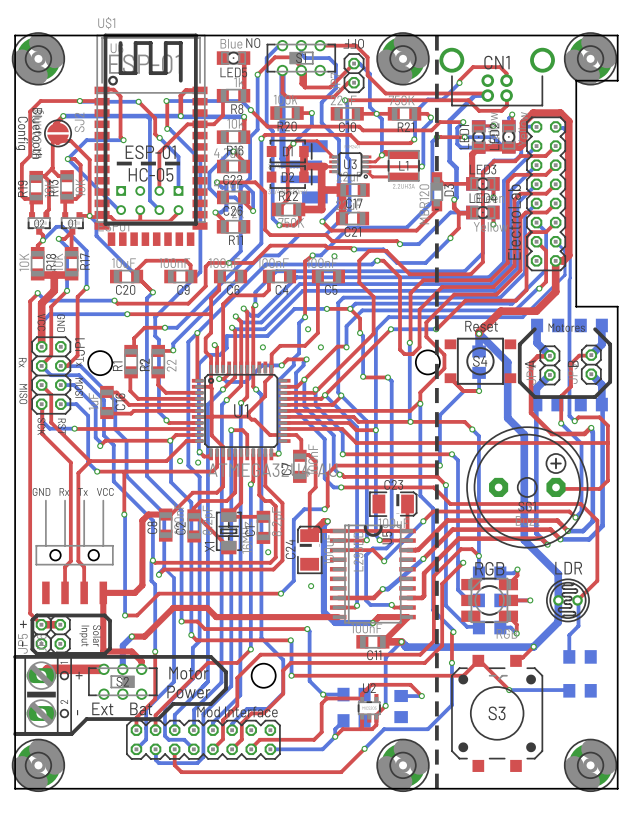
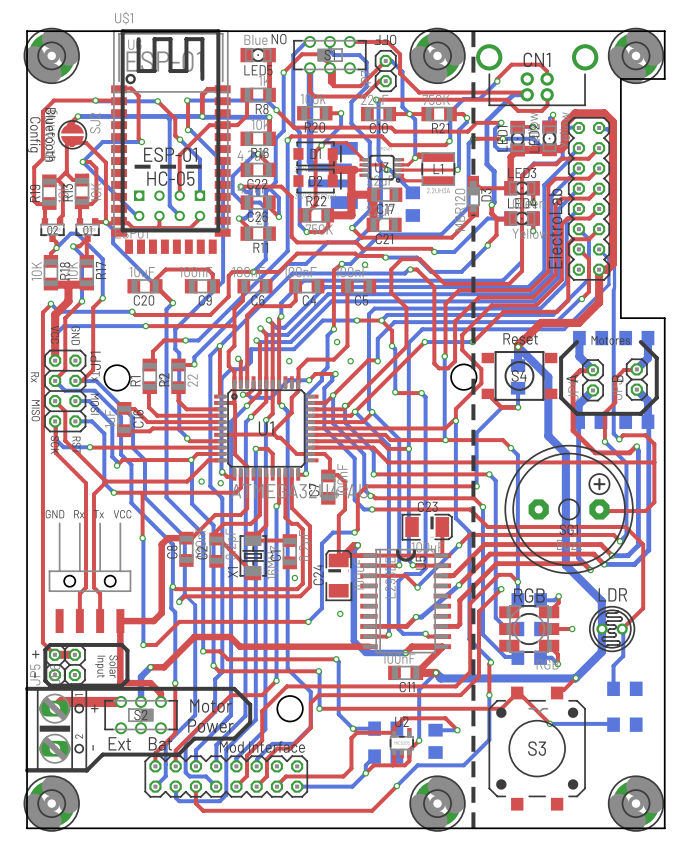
top track: none -> (363, 164) (382, 164) (387, 169)
bottom track: none -> (387, 169) (389, 169) (412, 192)
via: none -> (387, 169)
part: none -> (412, 204)

